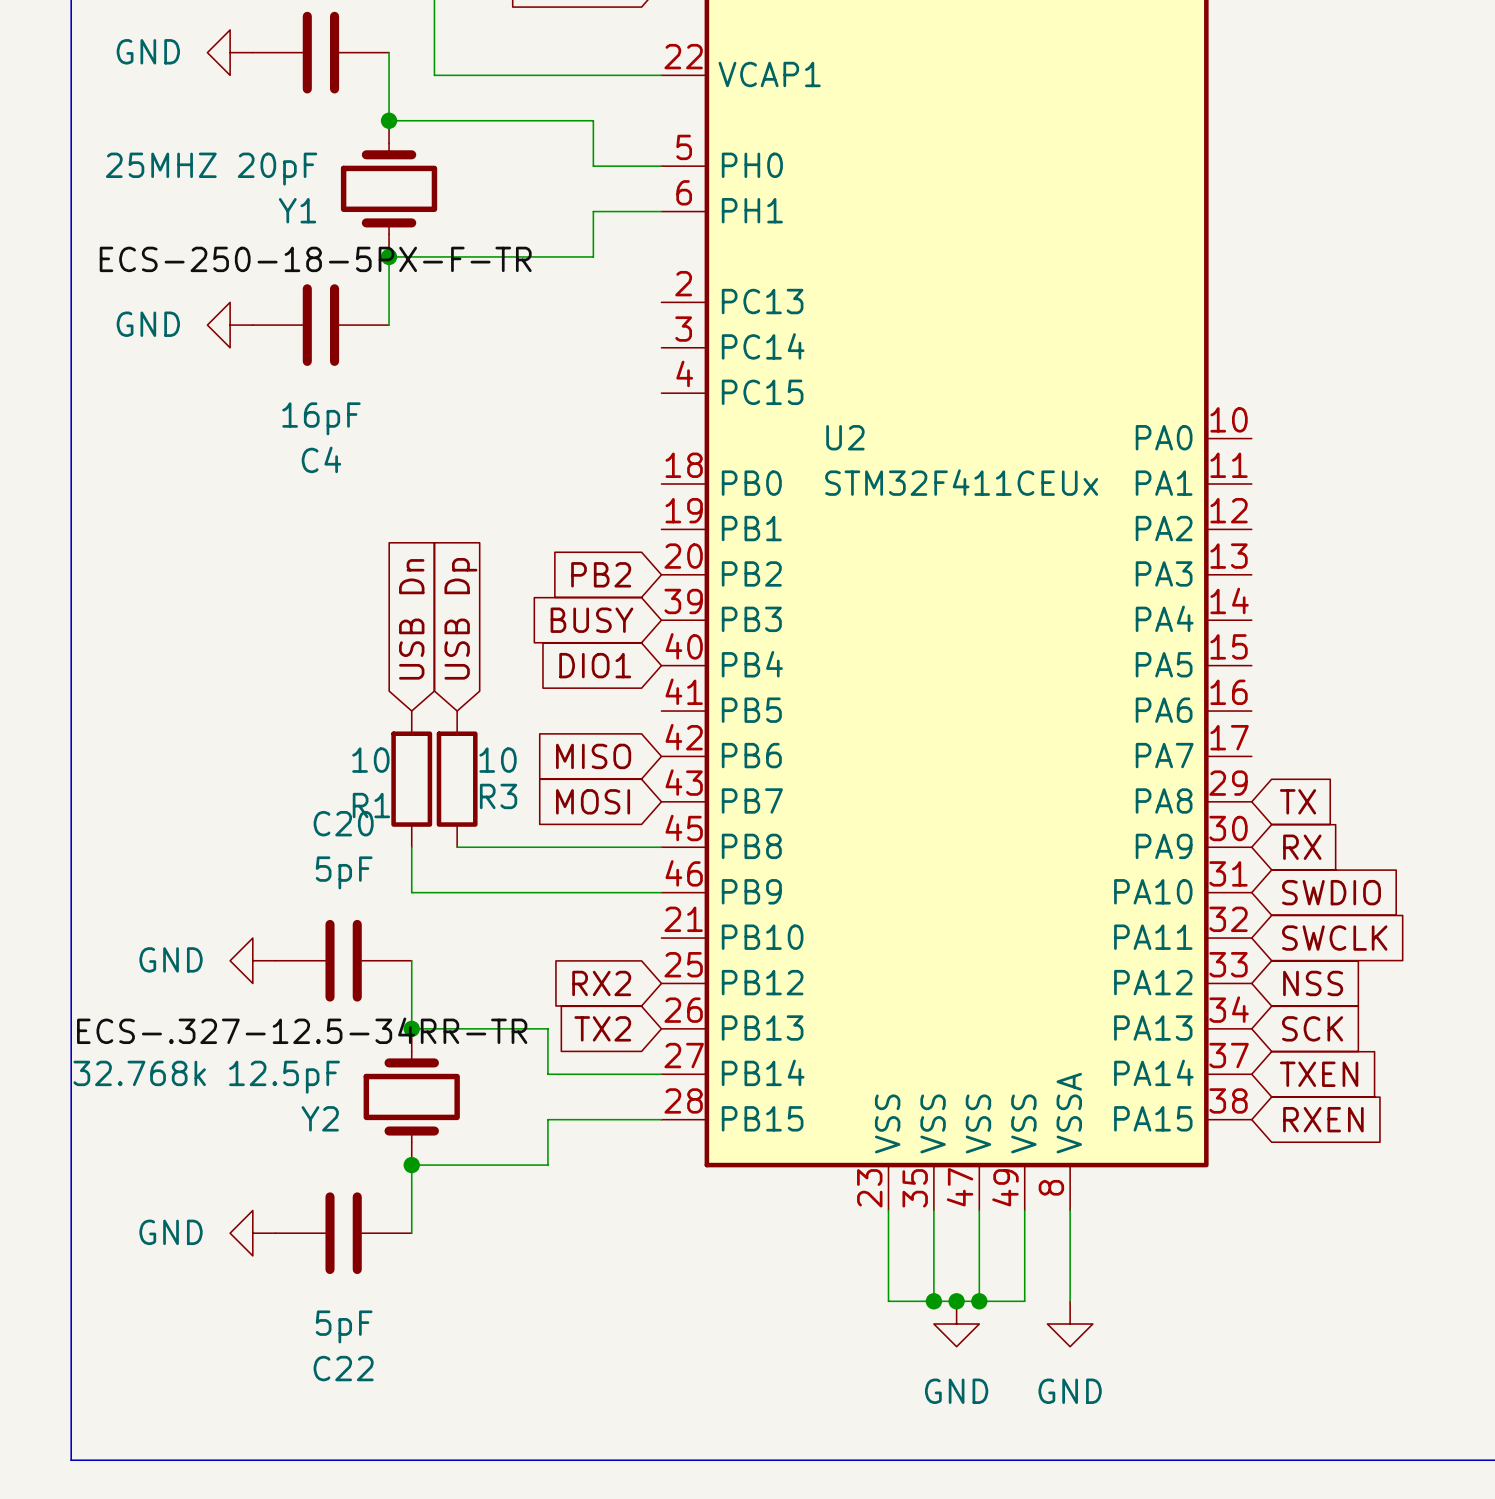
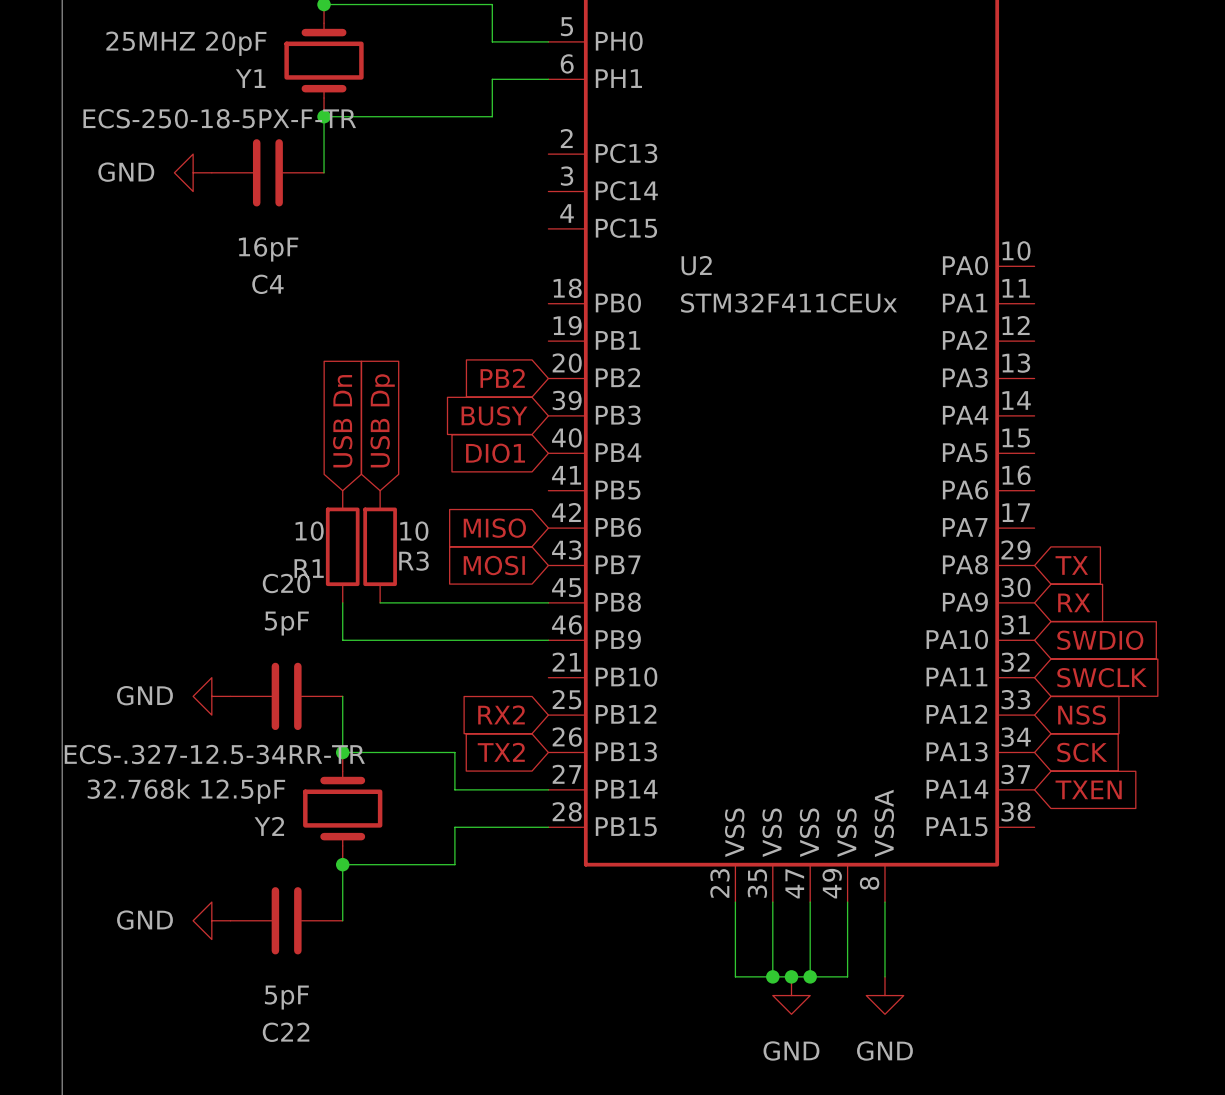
global label: RXEN (1323, 1119) -> none

